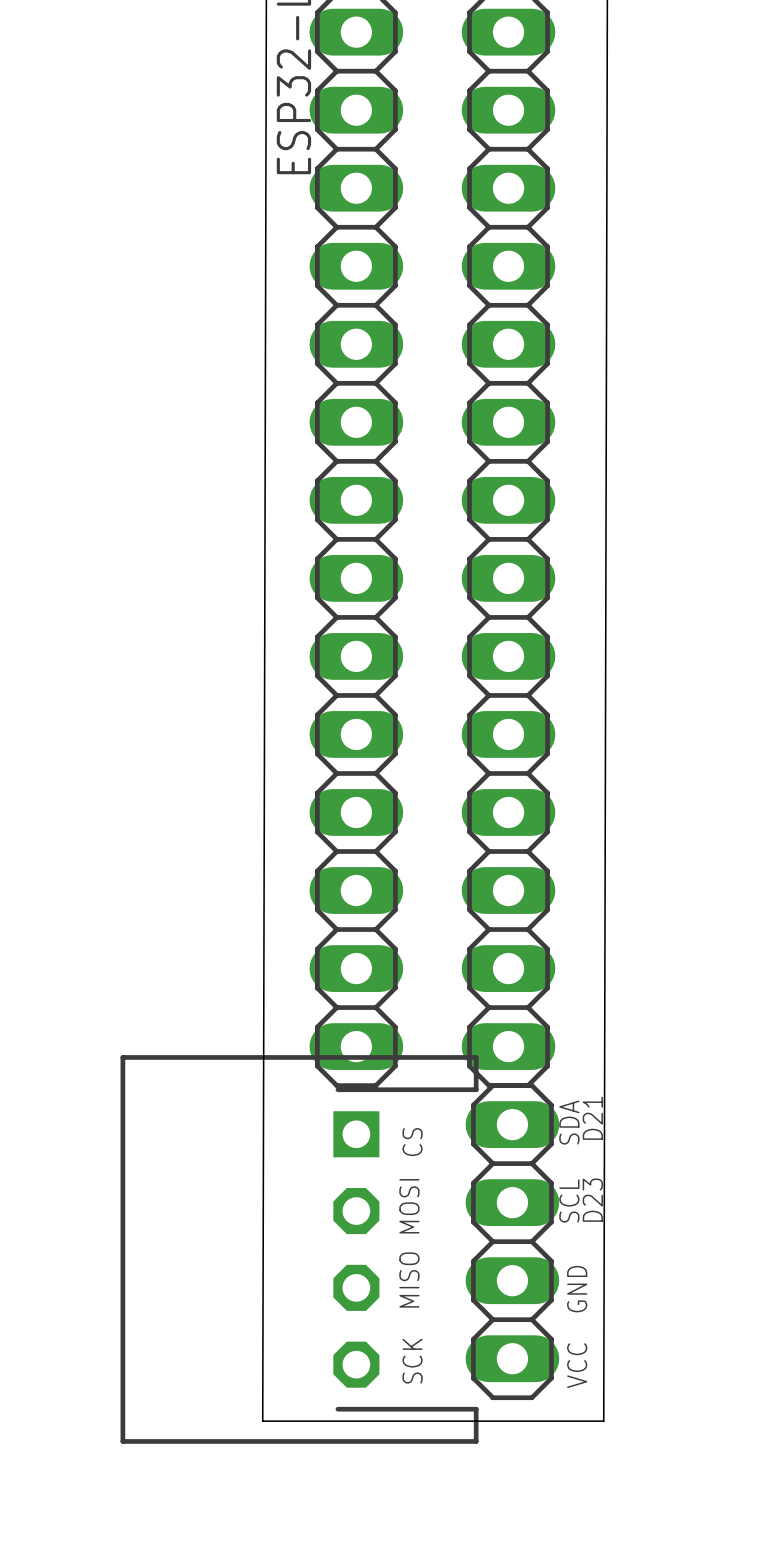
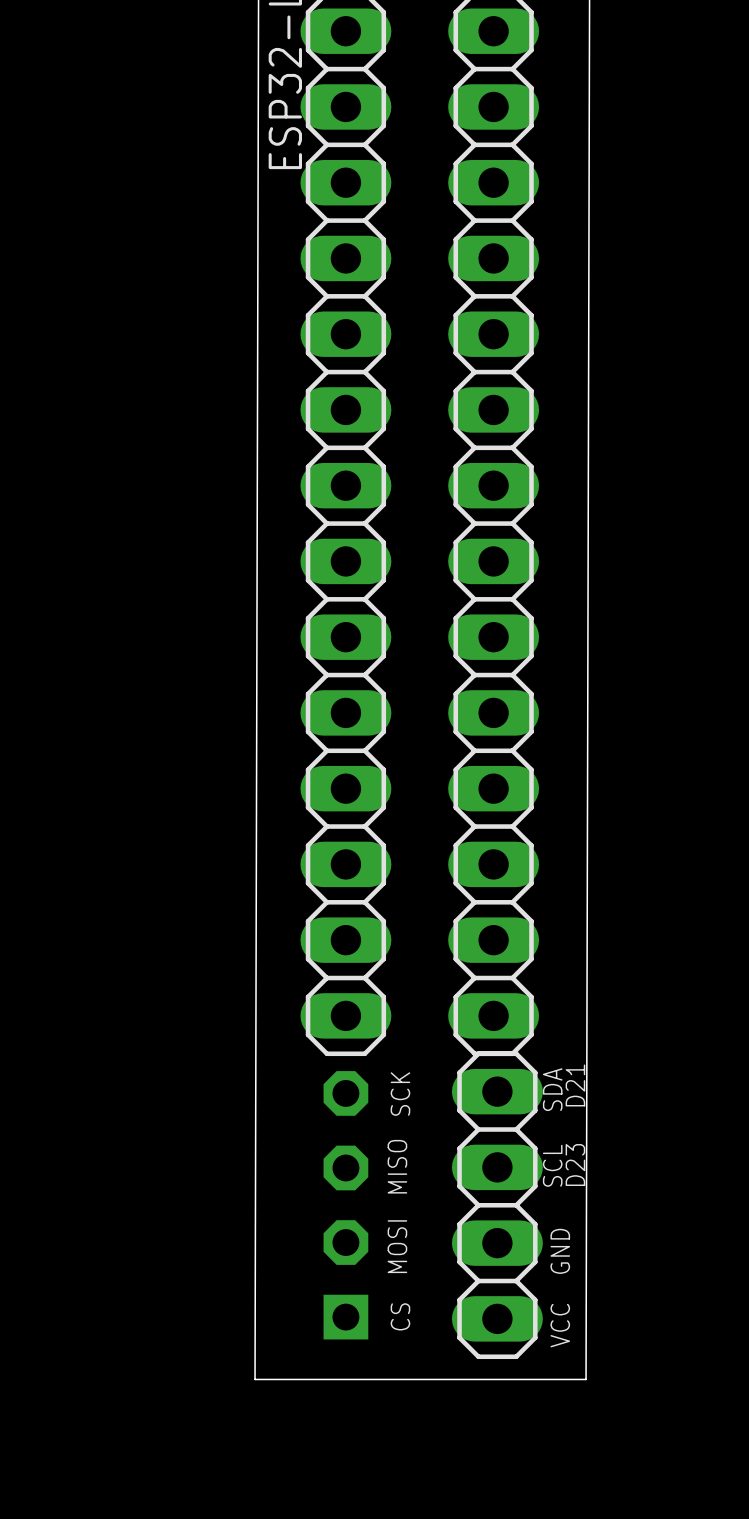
text position: CS (412, 1142) -> CS (400, 1316)
text position: MOSI (409, 1206) -> MOSI (397, 1246)
part side: top (299, 1249) -> bottom (345, 1205)
text position: MISO (409, 1280) -> MISO (397, 1166)
text position: SCK (412, 1361) -> SCK (400, 1094)

